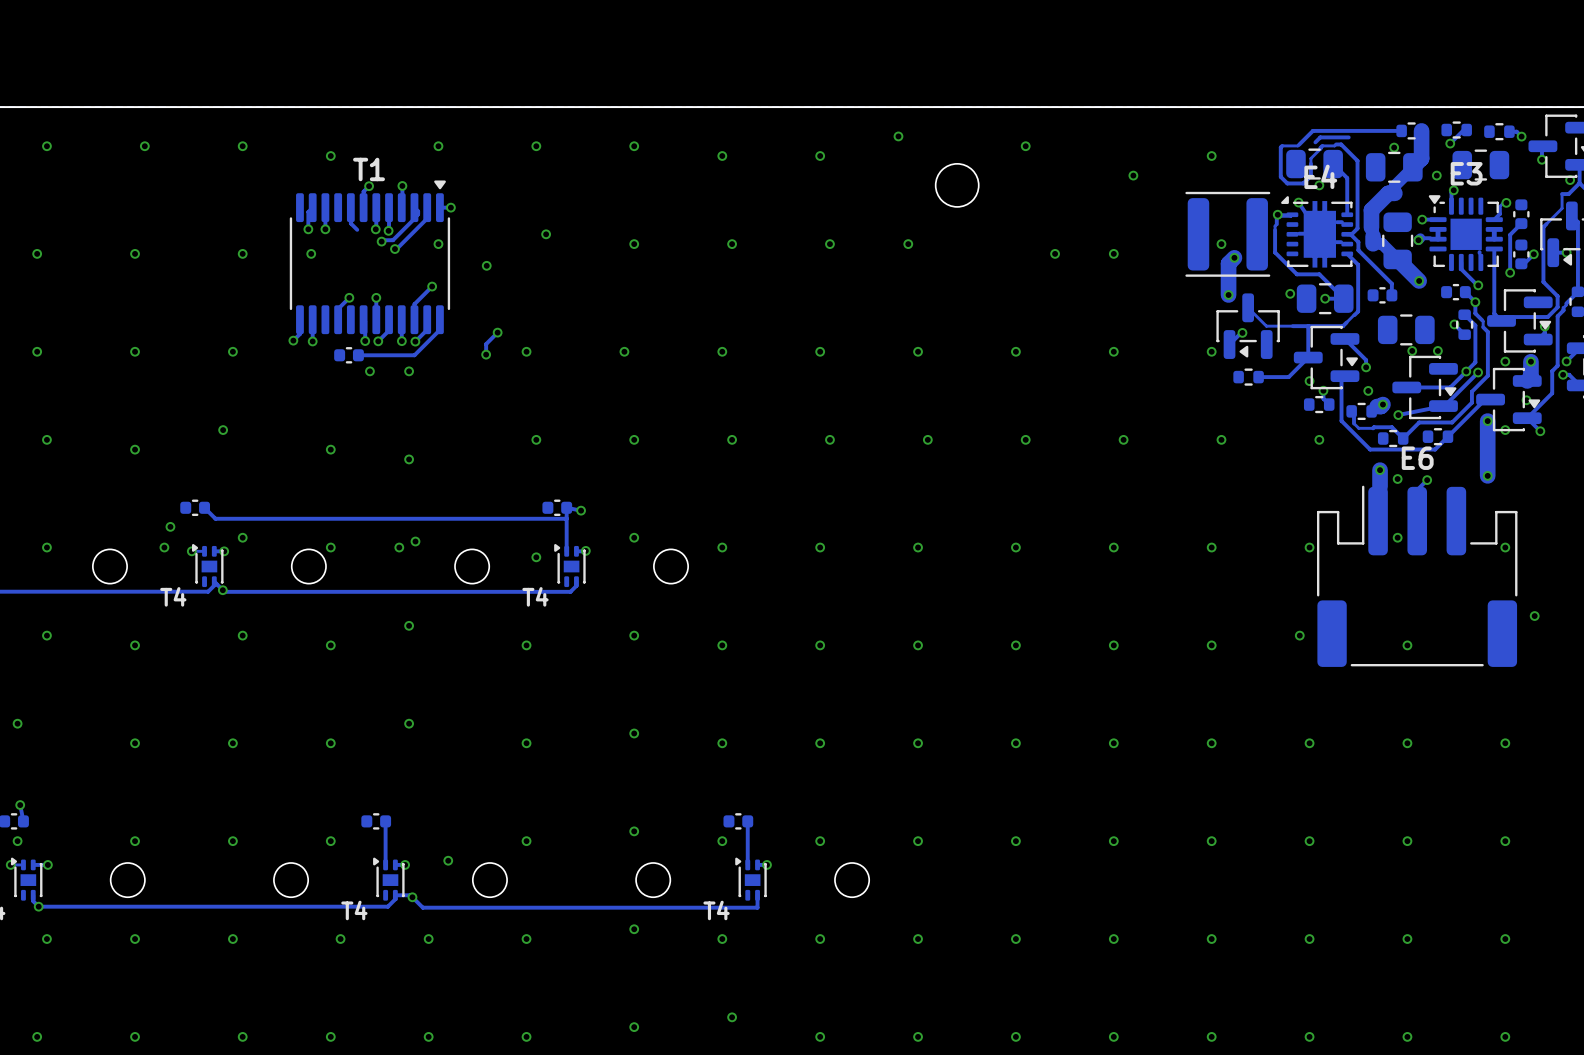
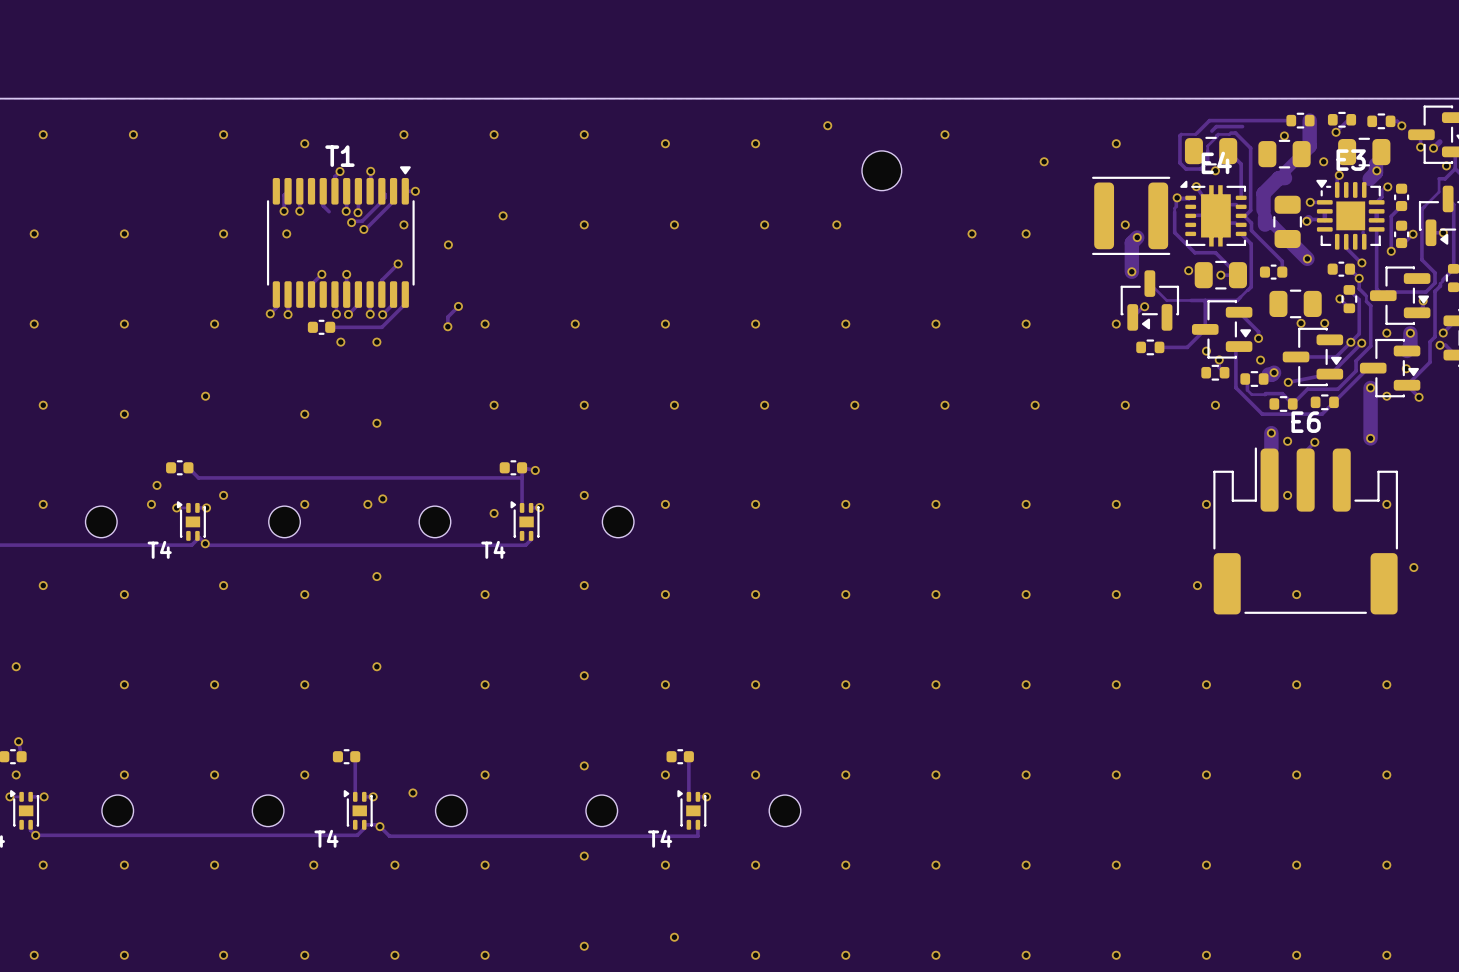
track: none -> (1439, 141) (1433, 148)
via: none -> (1433, 148)
track: none -> (1375, 164) (1375, 172) (1366, 181)
via: none -> (1376, 170)

